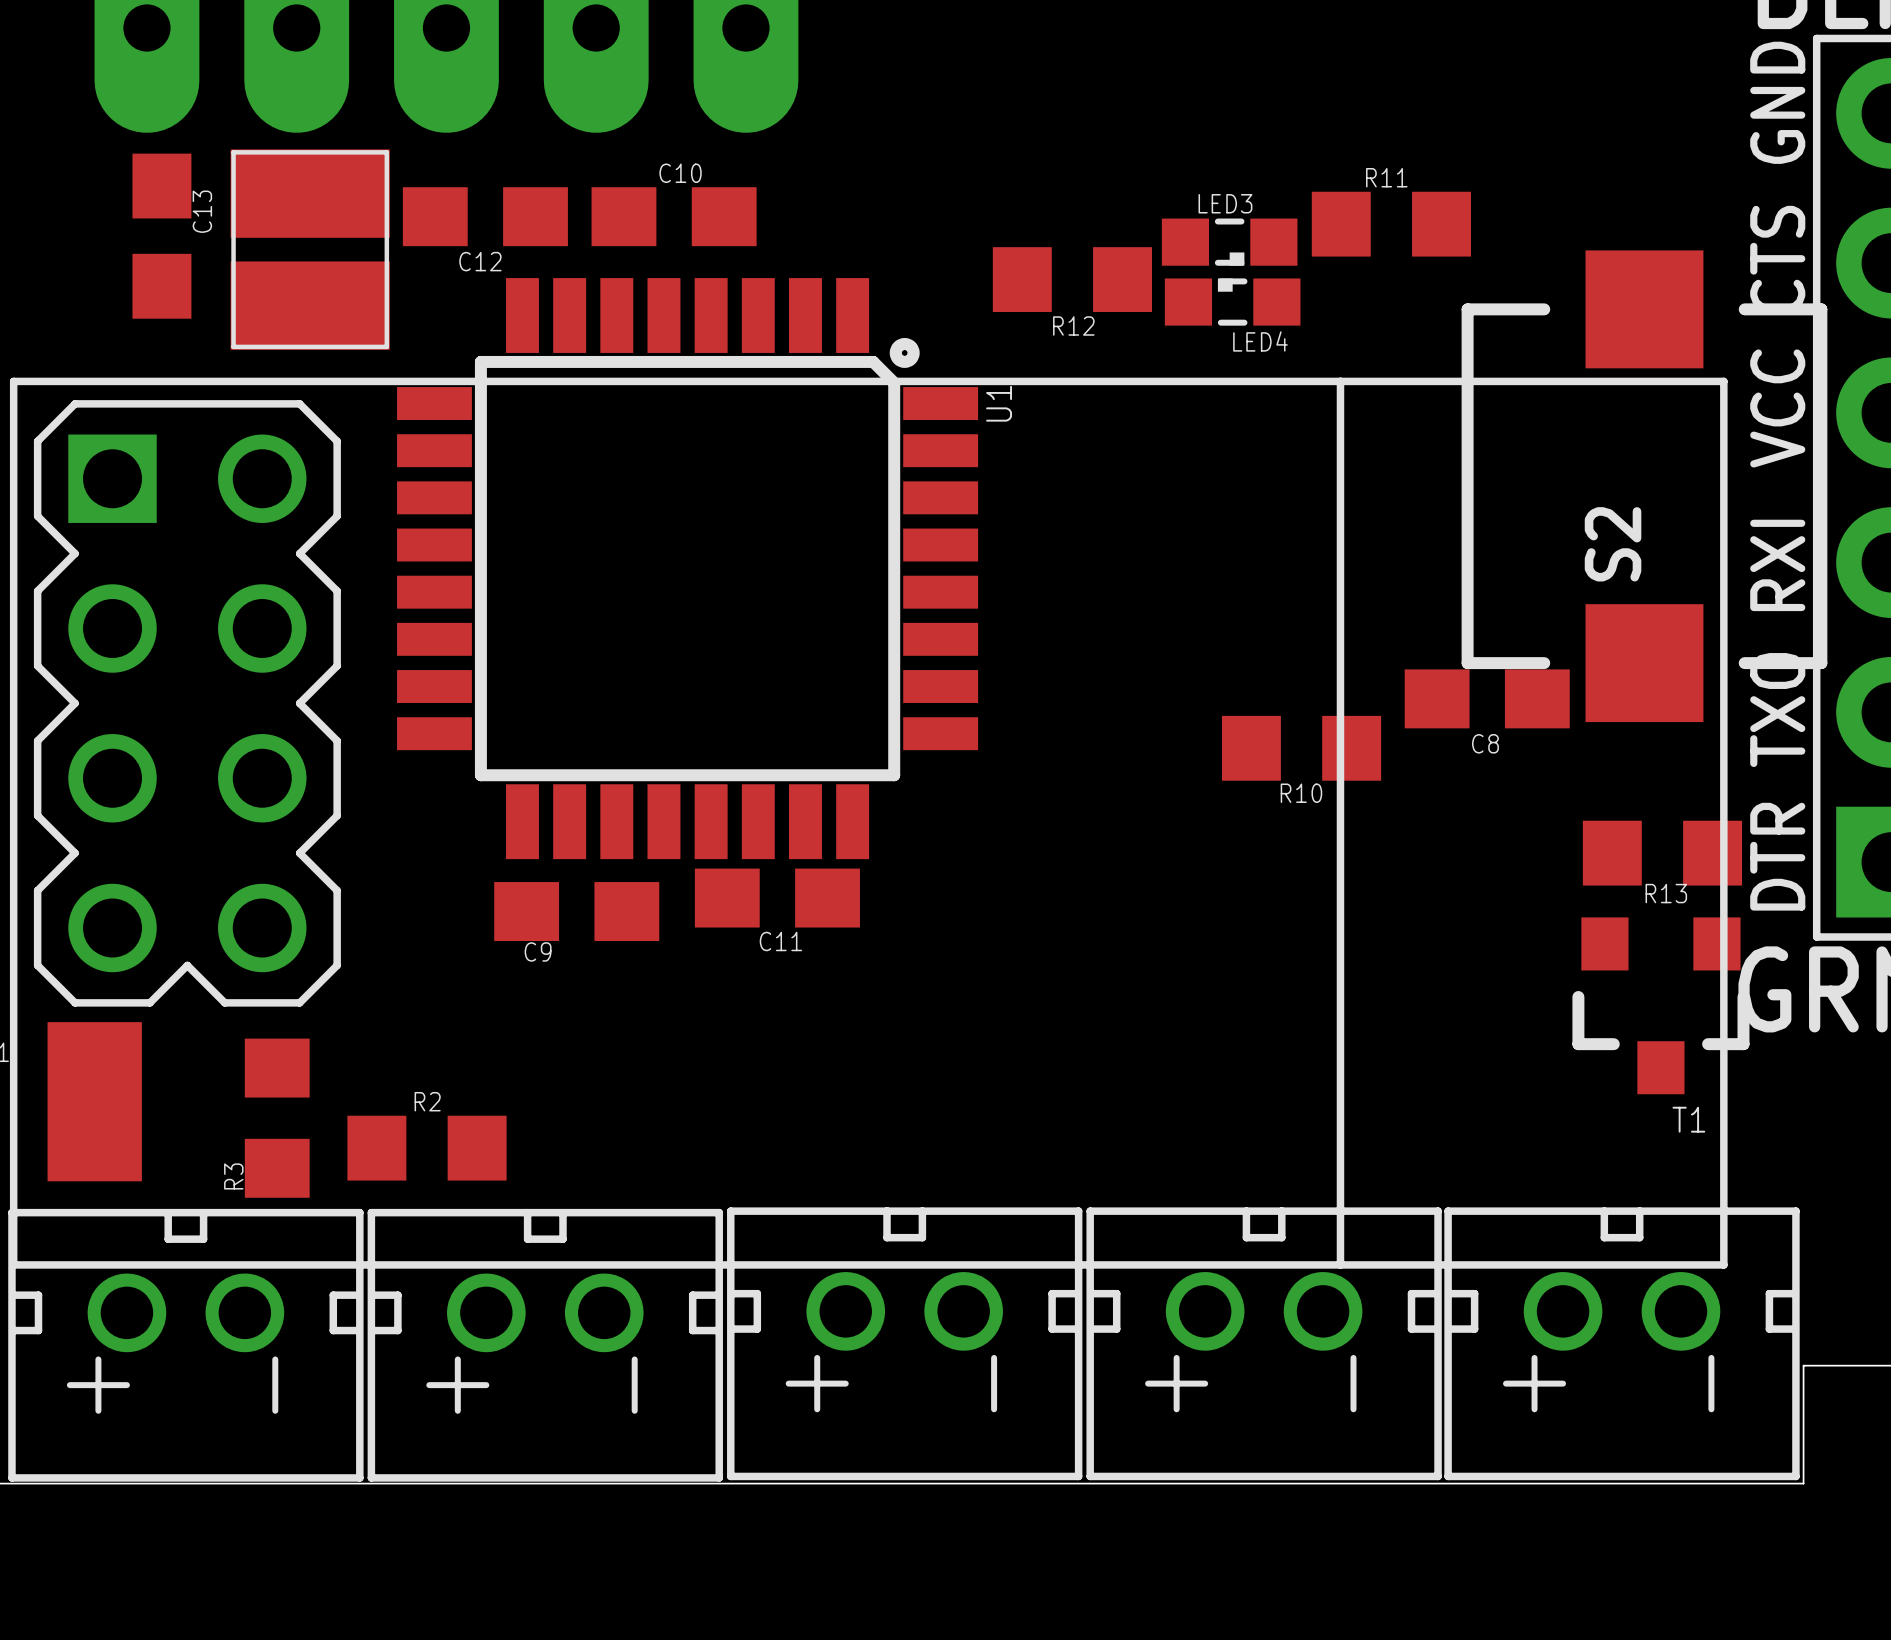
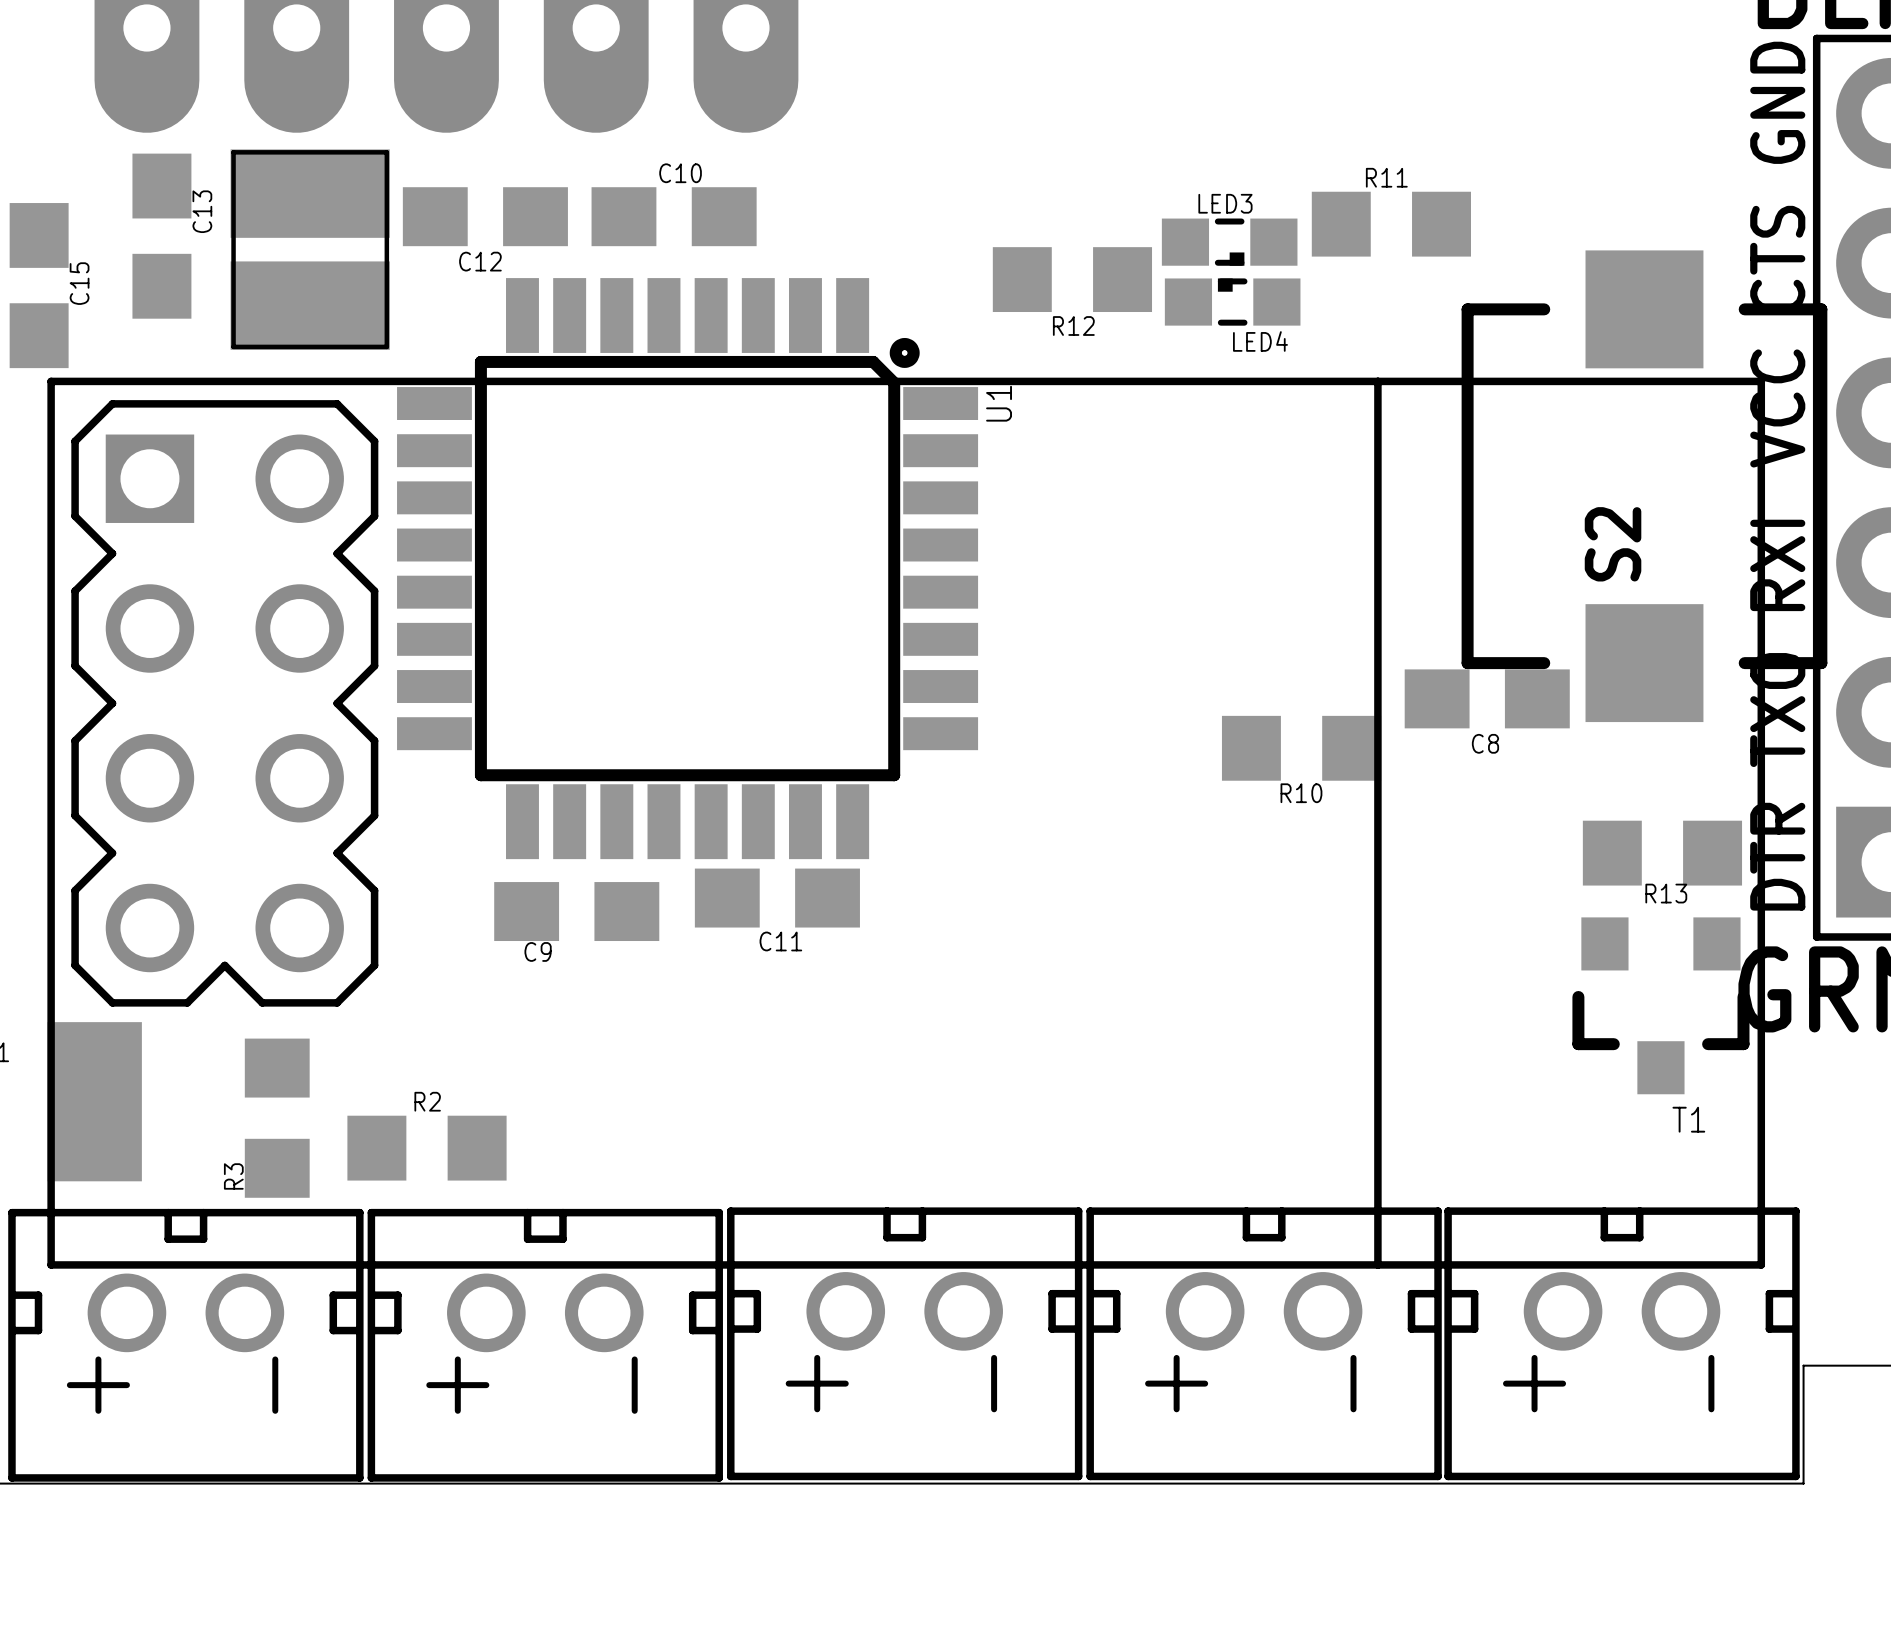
C15: none -> (39, 285)
part position: (868, 823) -> (906, 823)

